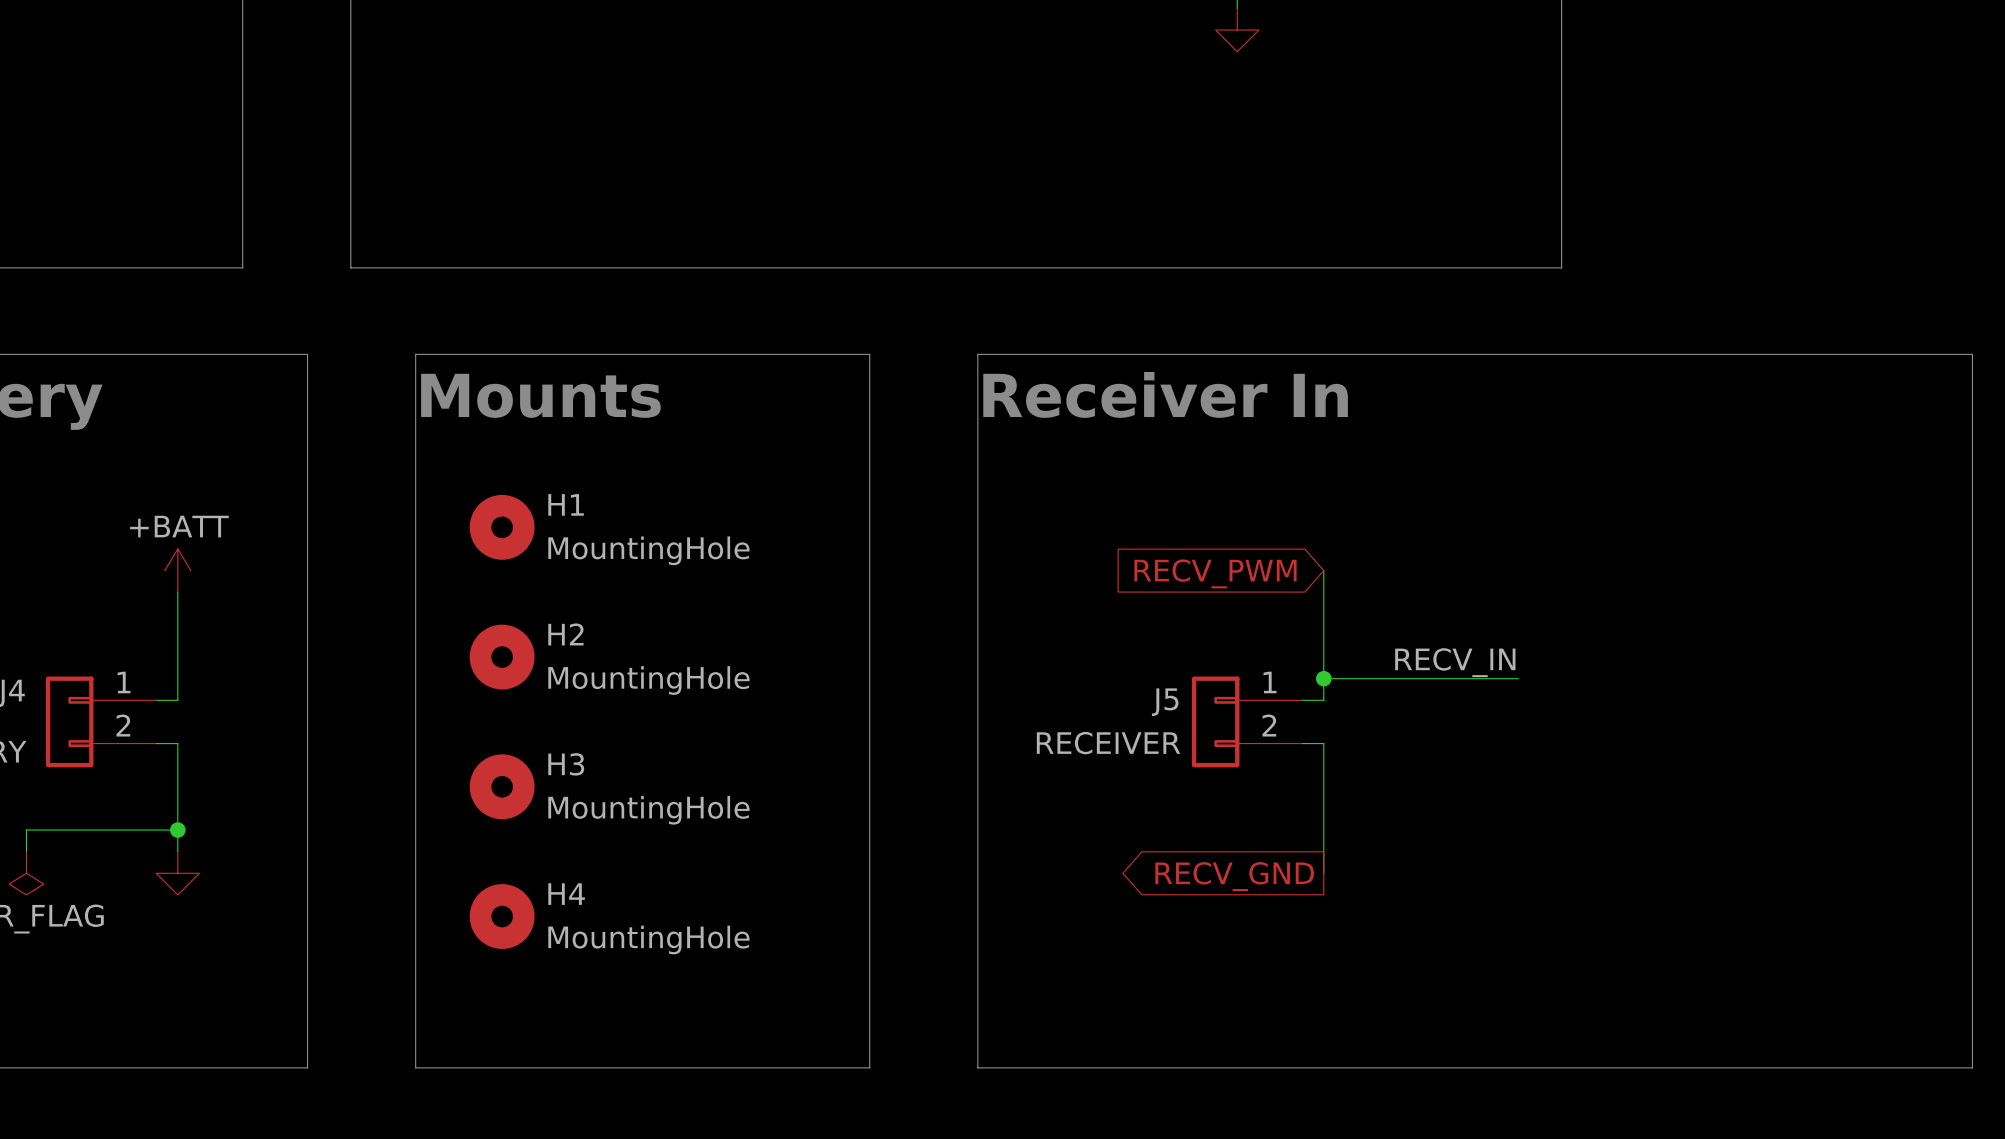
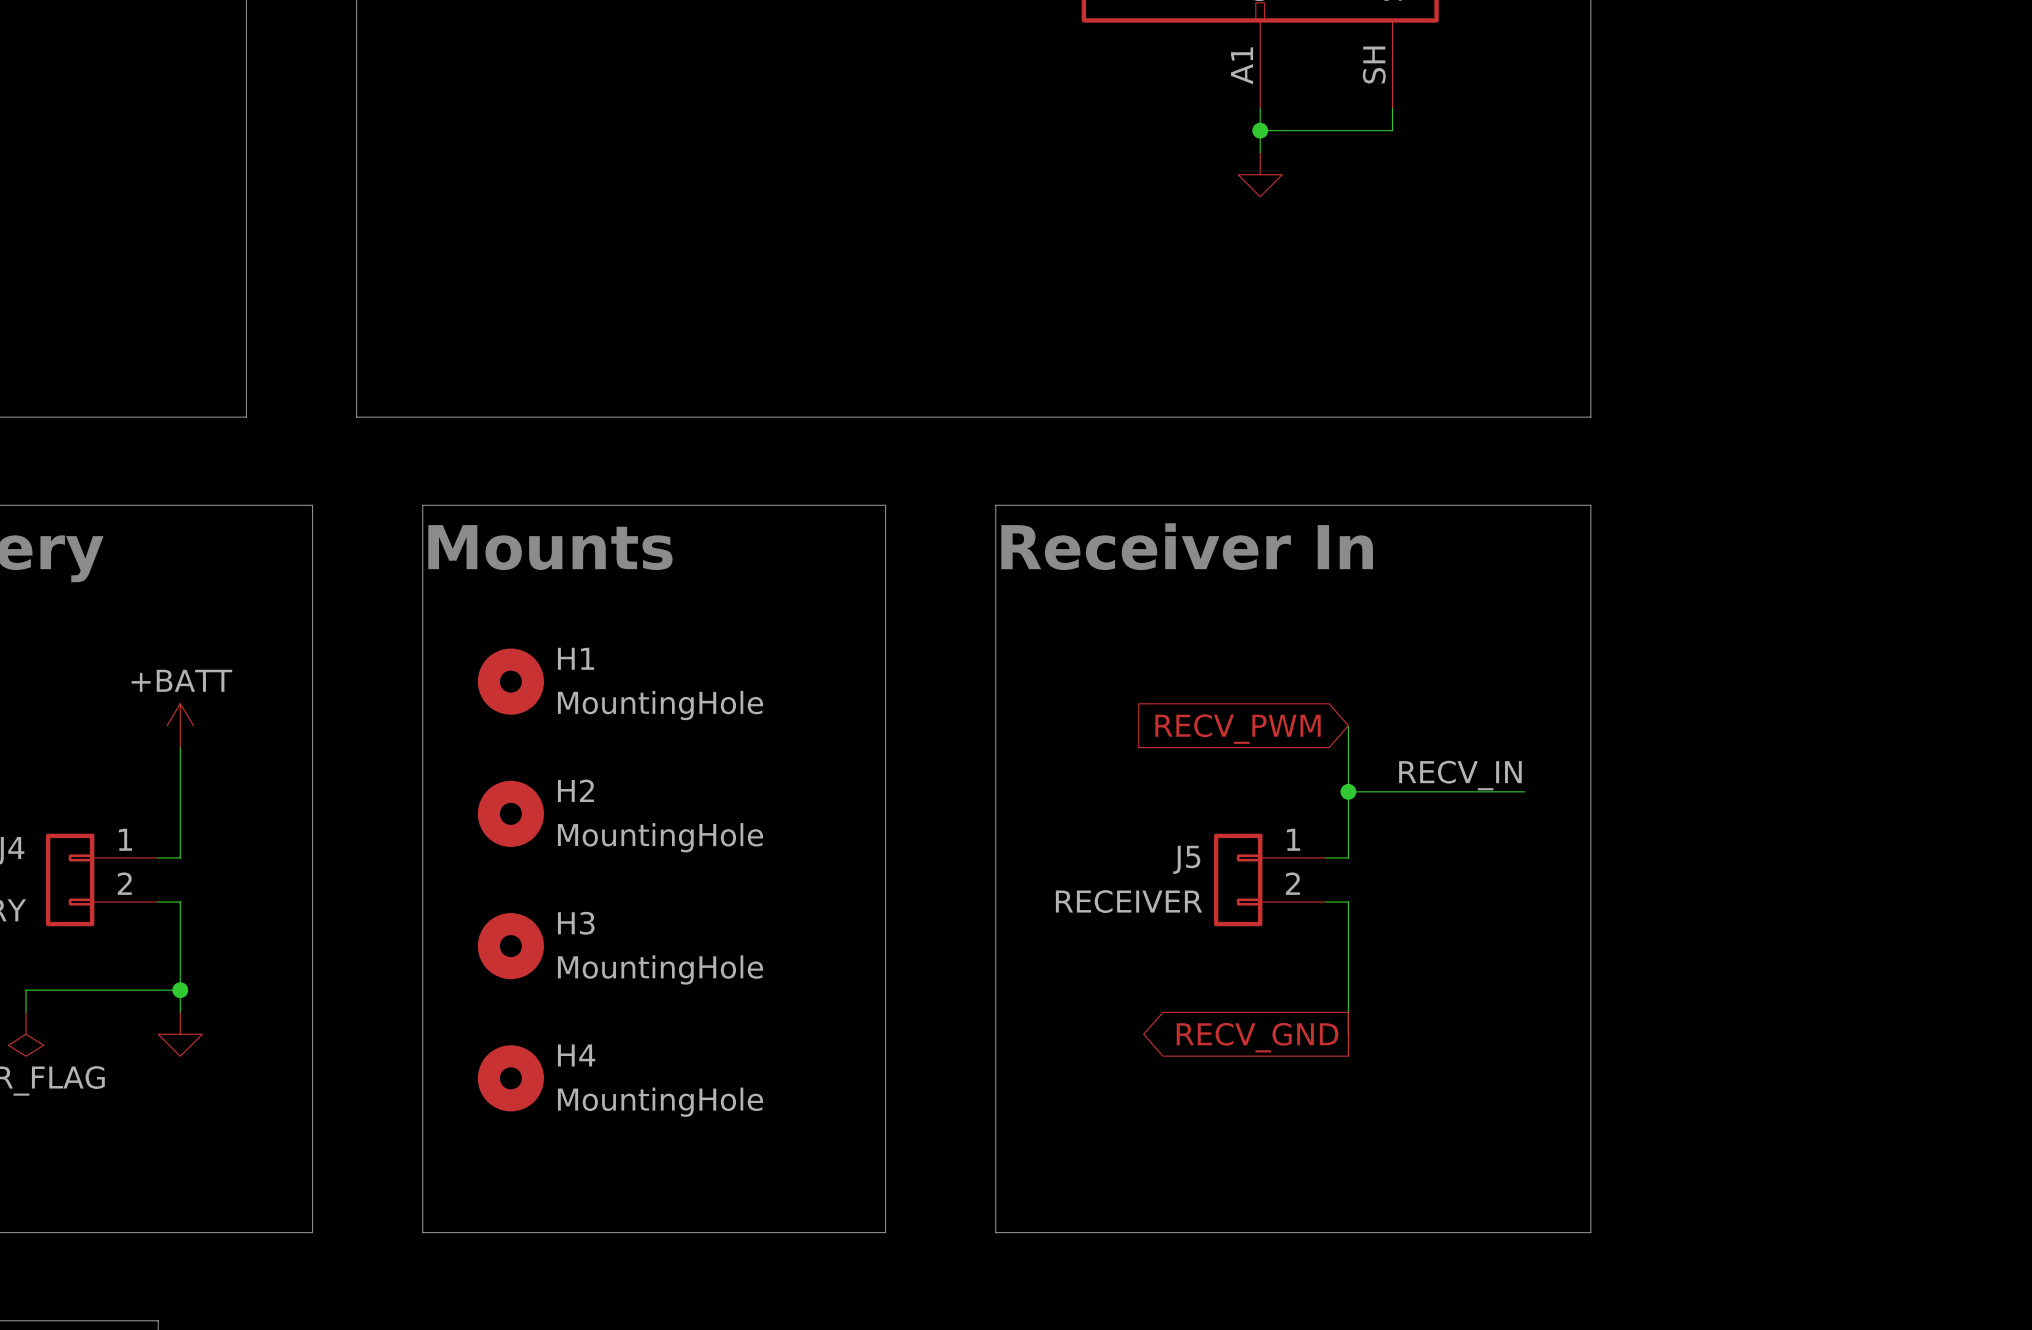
line: (1561, 354) (1972, 354) (1972, 1067) (1561, 1067) -> (1590, 505) (1590, 1232)
wire: none -> (1348, 791) (1524, 791)
label position: RECV_IN (1455, 662) -> RECV_IN (1460, 775)
wire: (1323, 678) (1518, 678) -> none
junction position: (1323, 678) -> (1348, 791)

